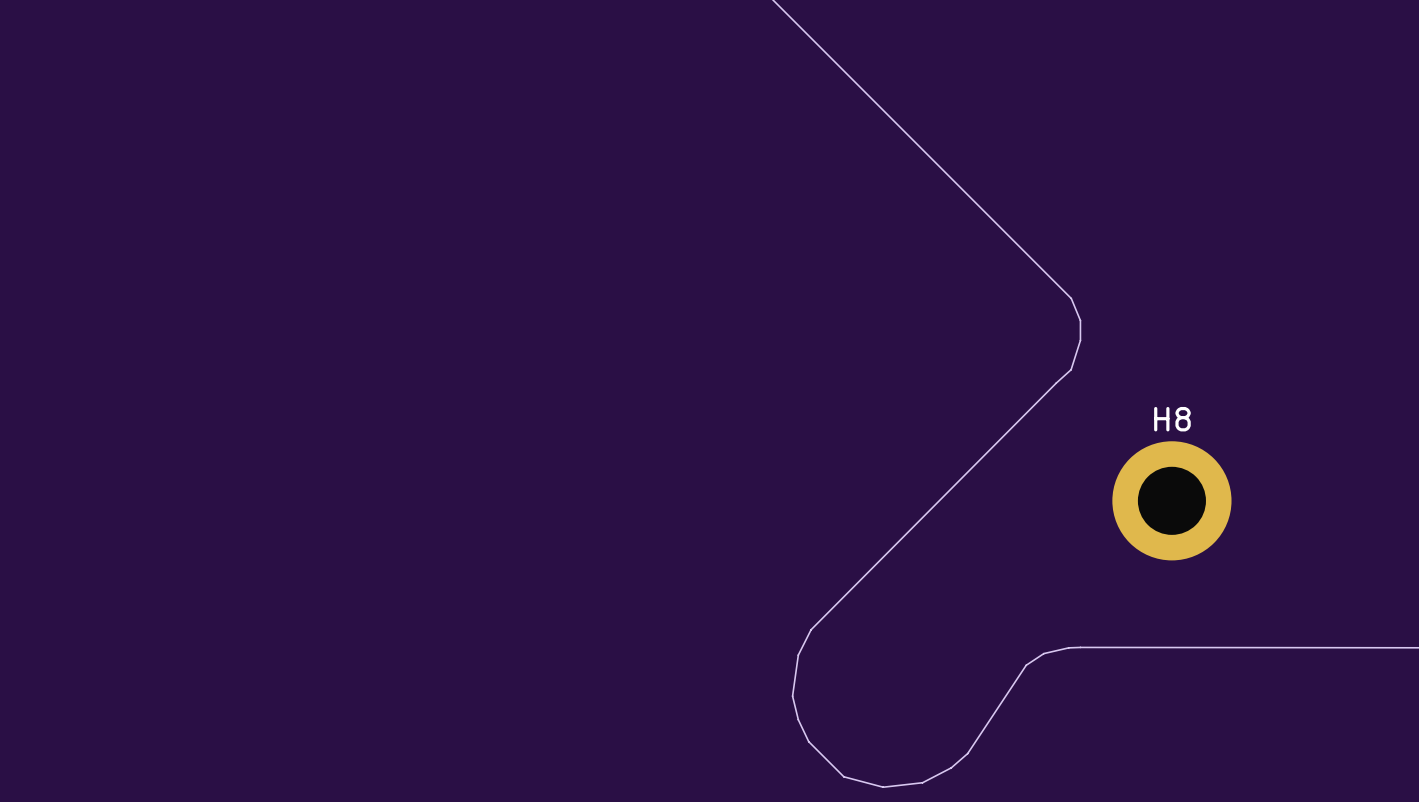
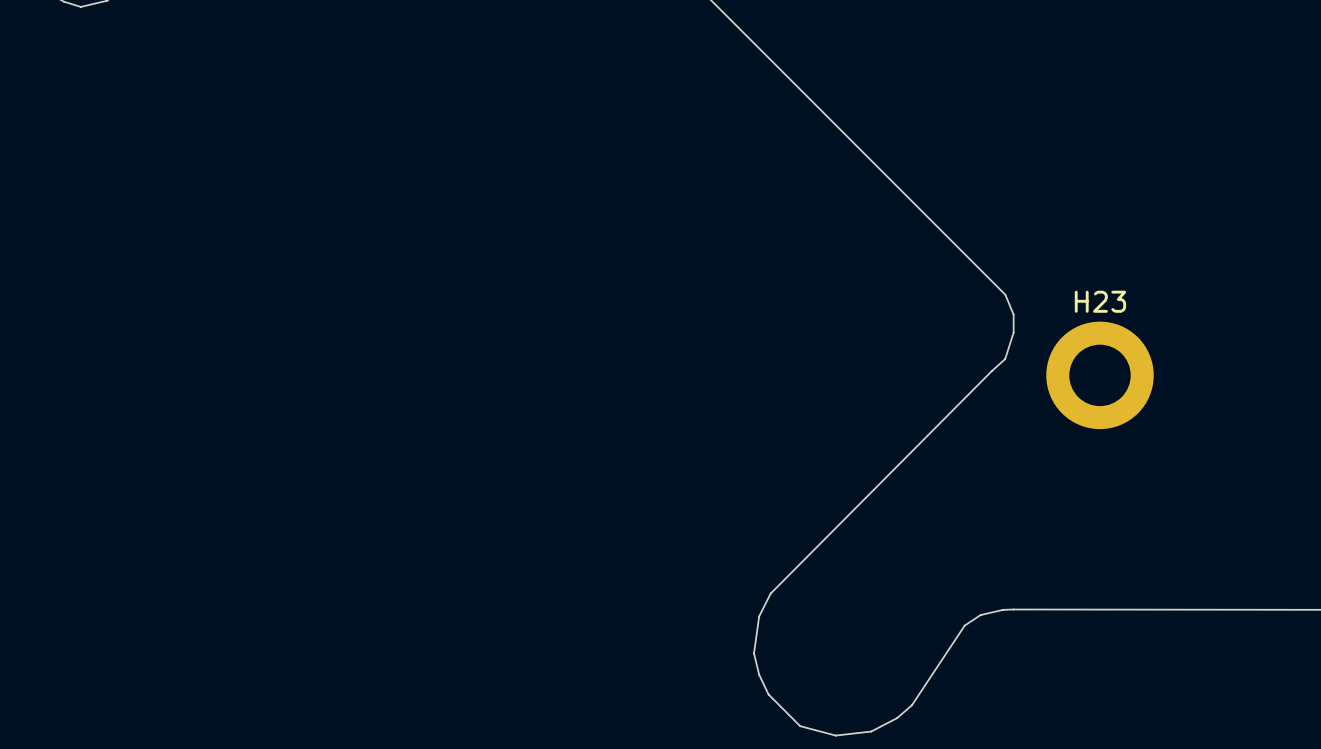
H23: none -> (1099, 375)
H8: (1171, 500) -> none

